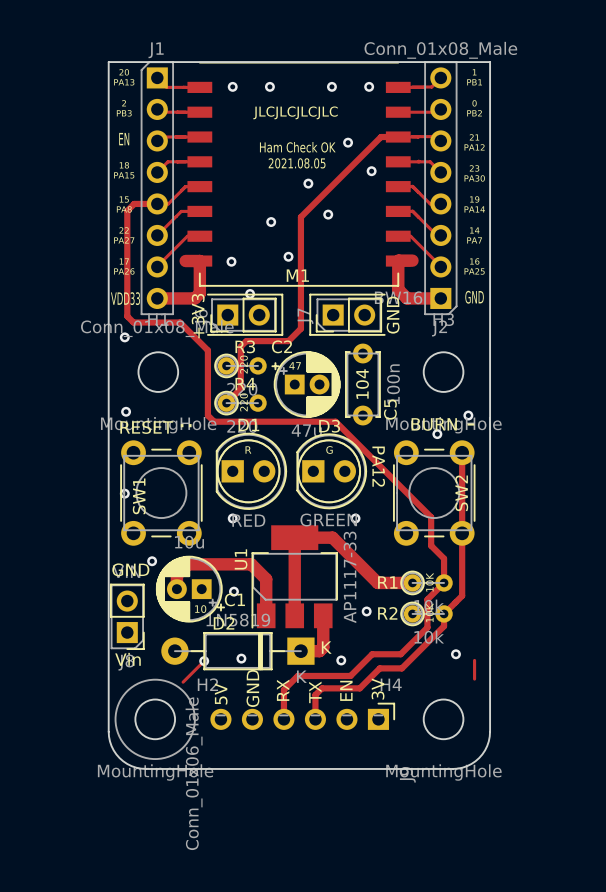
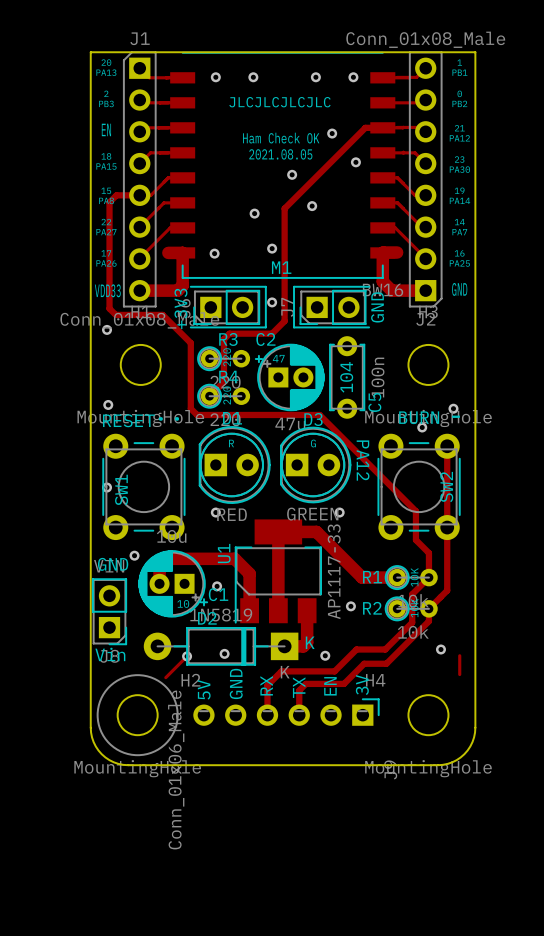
via position: (250, 293) -> (272, 302)

